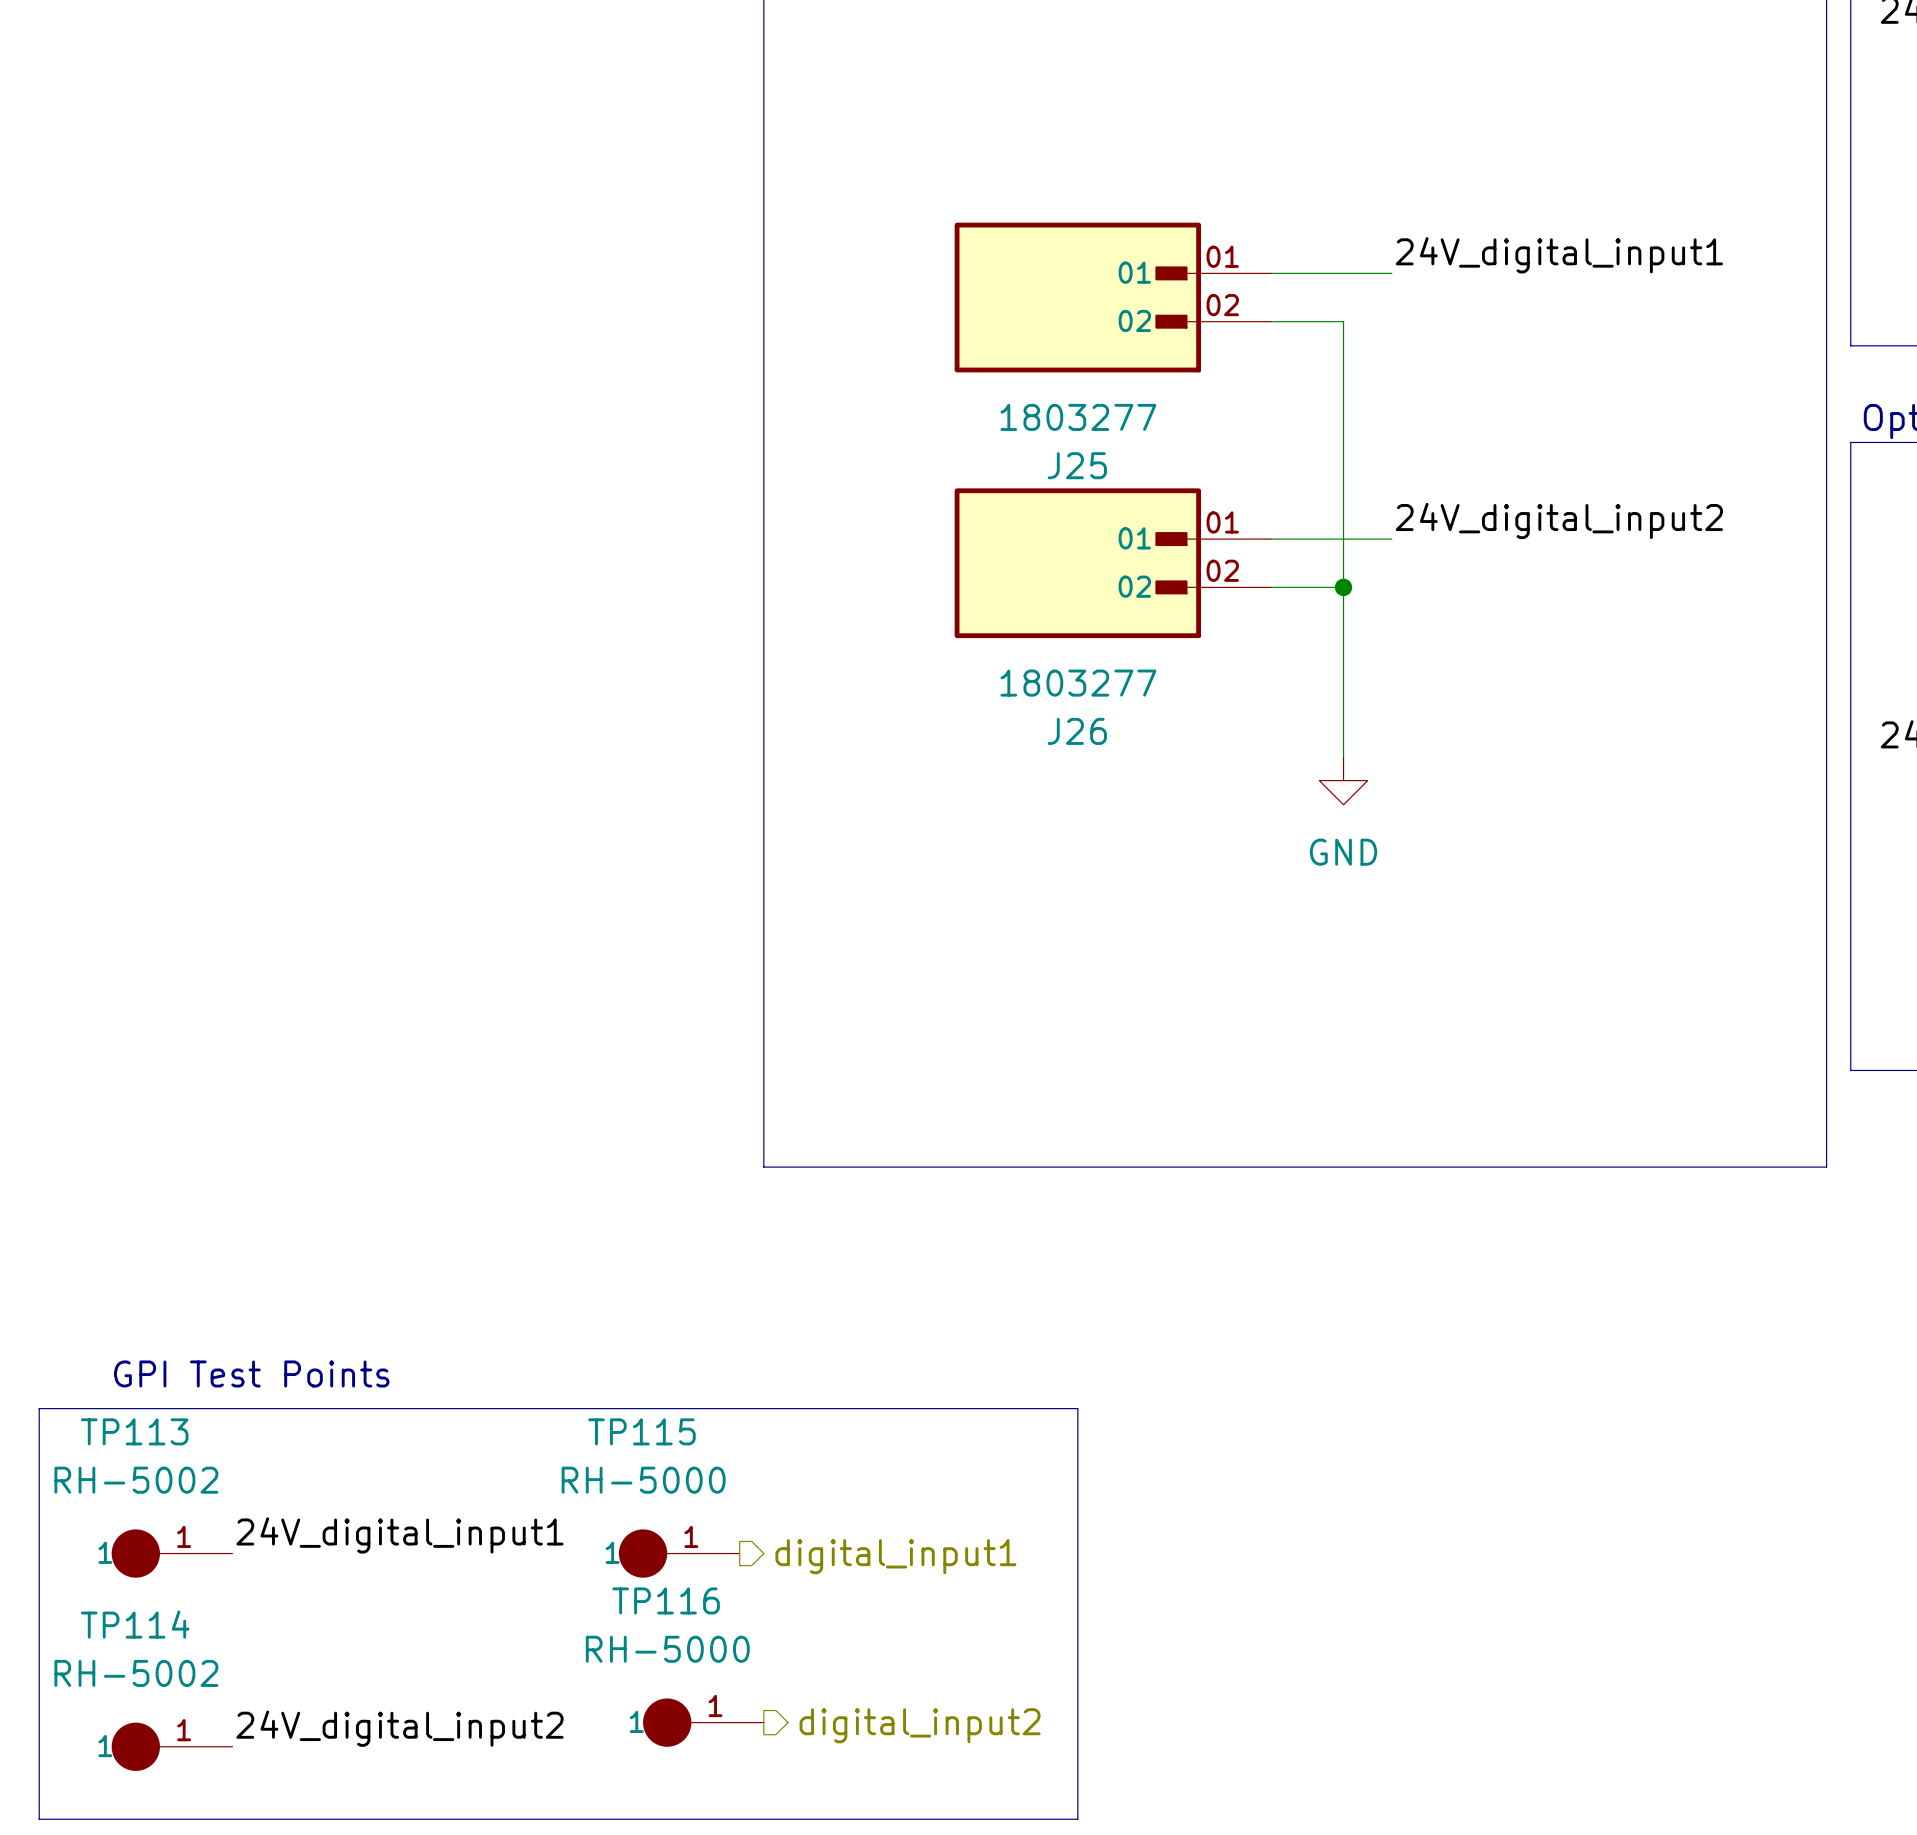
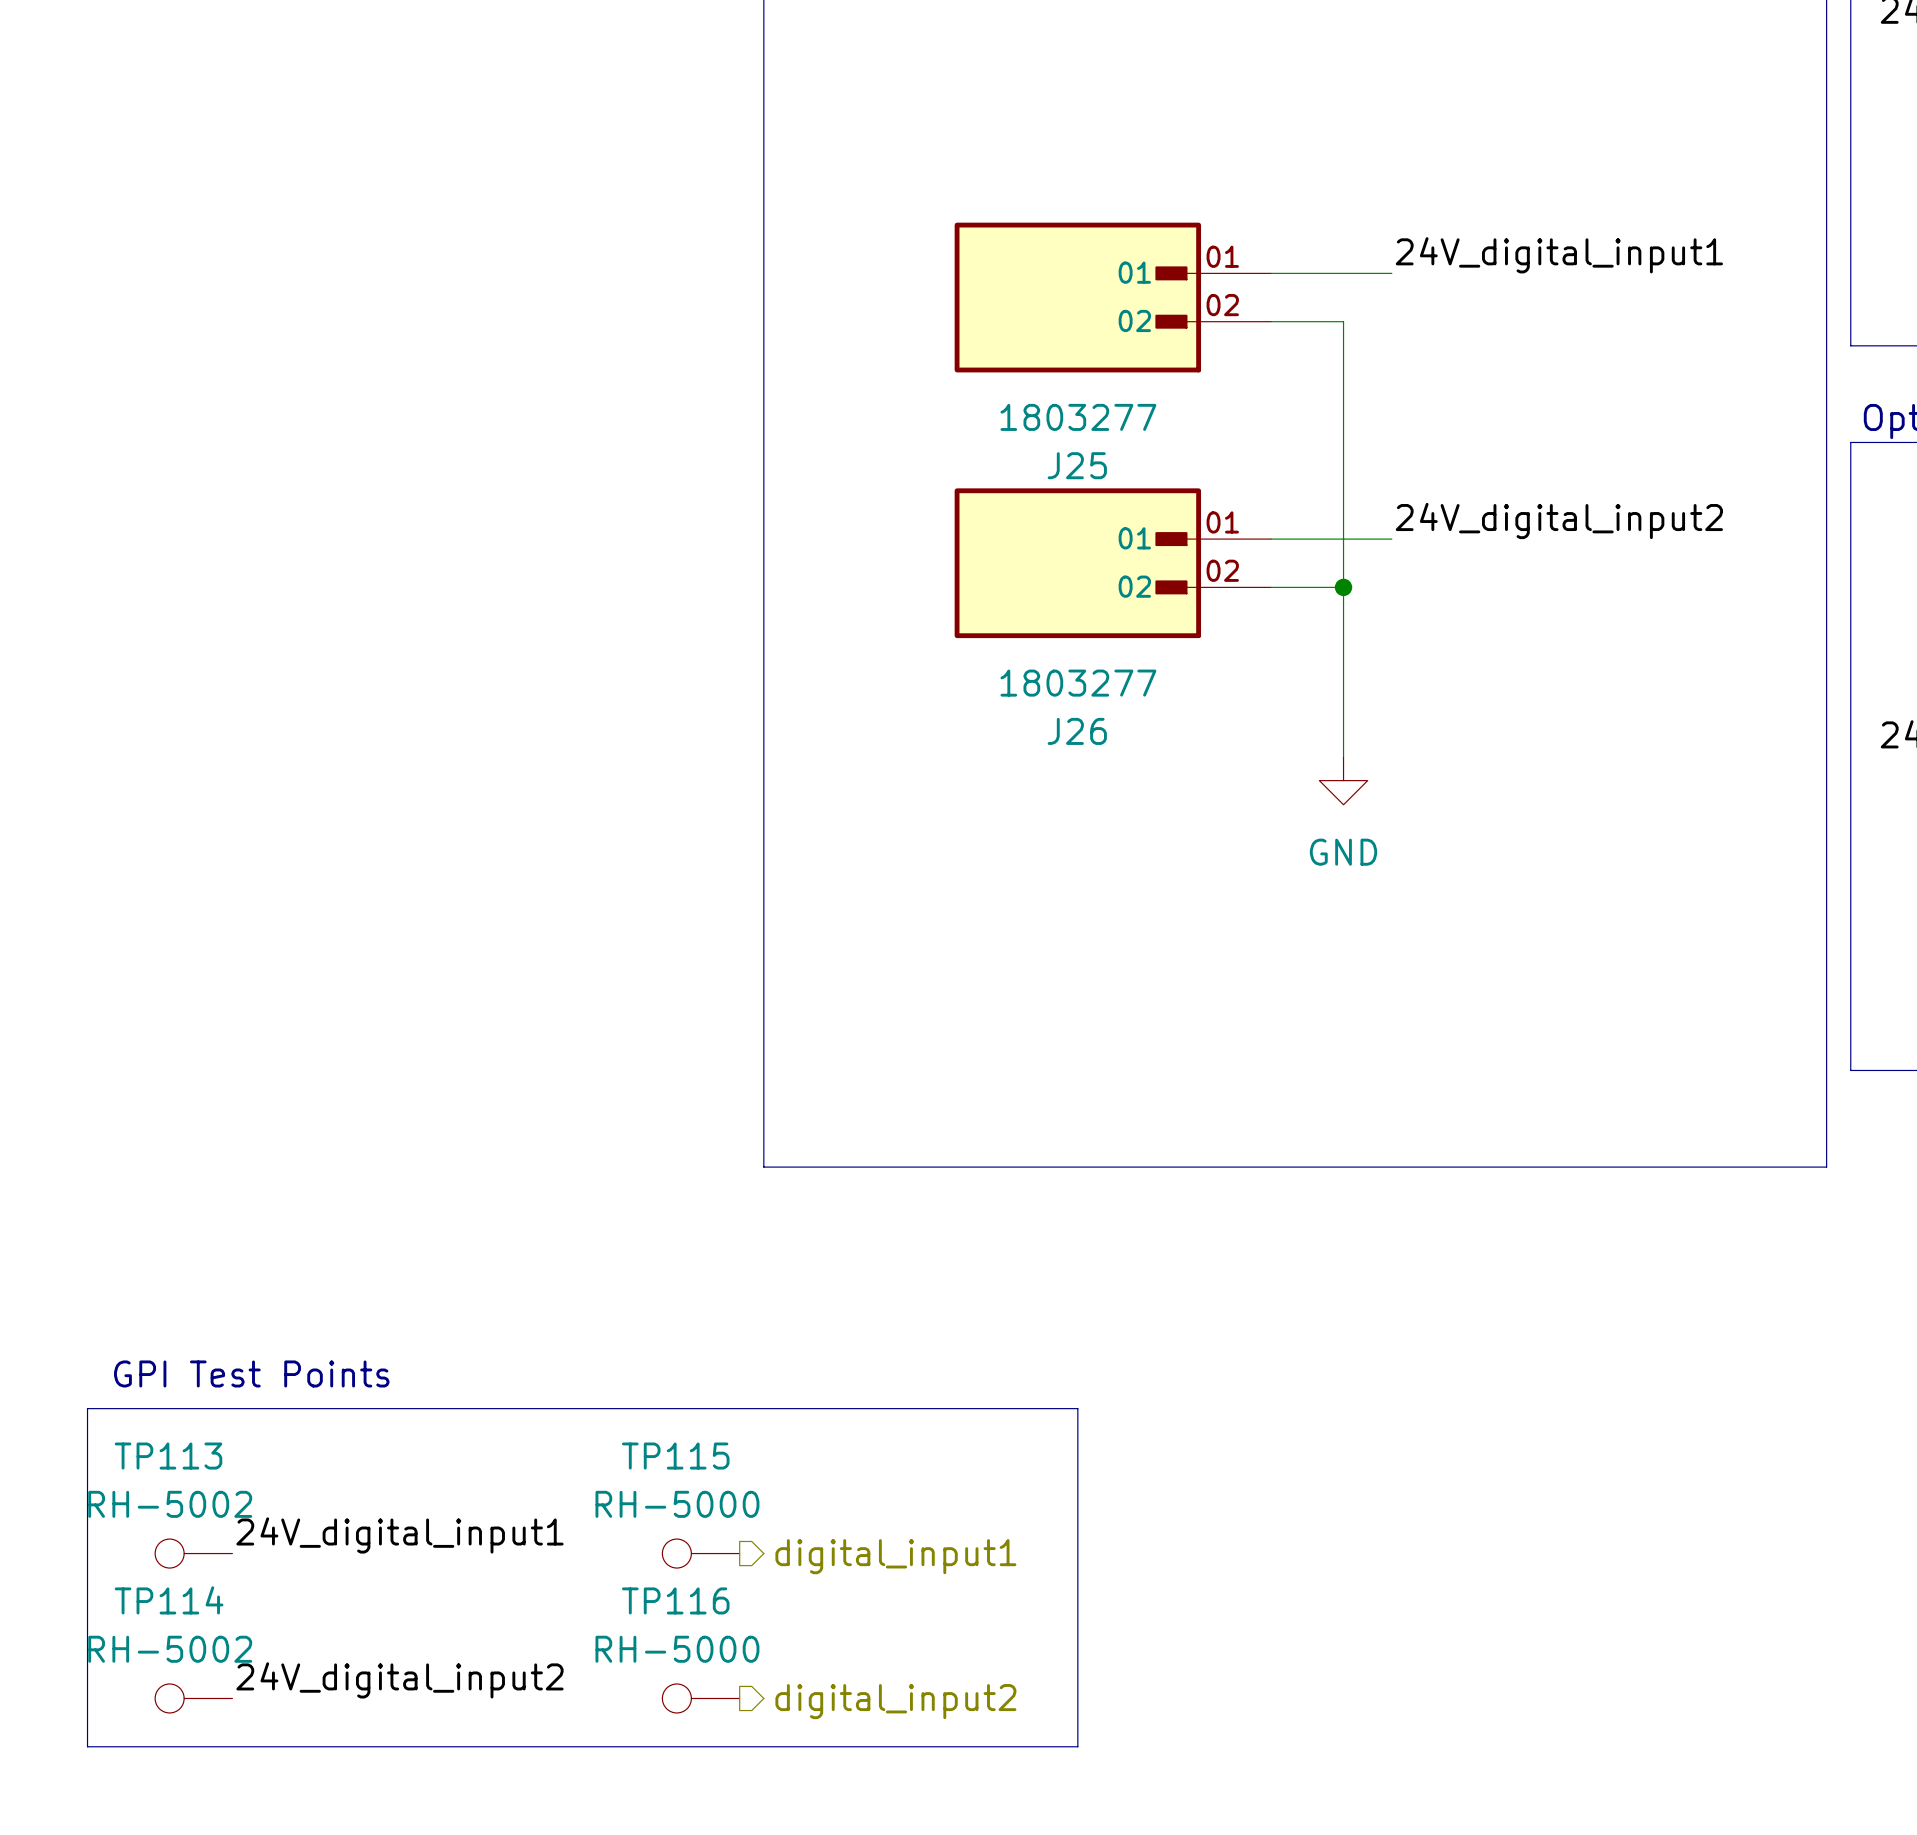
line: (87, 1408) (39, 1408) (39, 1819) (1077, 1819) (1077, 1746) -> (87, 1408) (87, 1746) (1077, 1746)
TP113 symbol: [111, 1529, 233, 1578] -> [155, 1539, 233, 1569]
TP115 symbol: [618, 1529, 740, 1578] -> [662, 1539, 740, 1569]
TP116 symbol: [643, 1698, 764, 1747] -> [662, 1683, 740, 1713]
TP114 symbol: [111, 1722, 233, 1771] -> [155, 1683, 233, 1713]
hierarchical label position: digital_input2 (920, 1725) -> digital_input2 (895, 1701)
label position: 24V_digital_input2 (399, 1728) -> 24V_digital_input2 (399, 1680)

